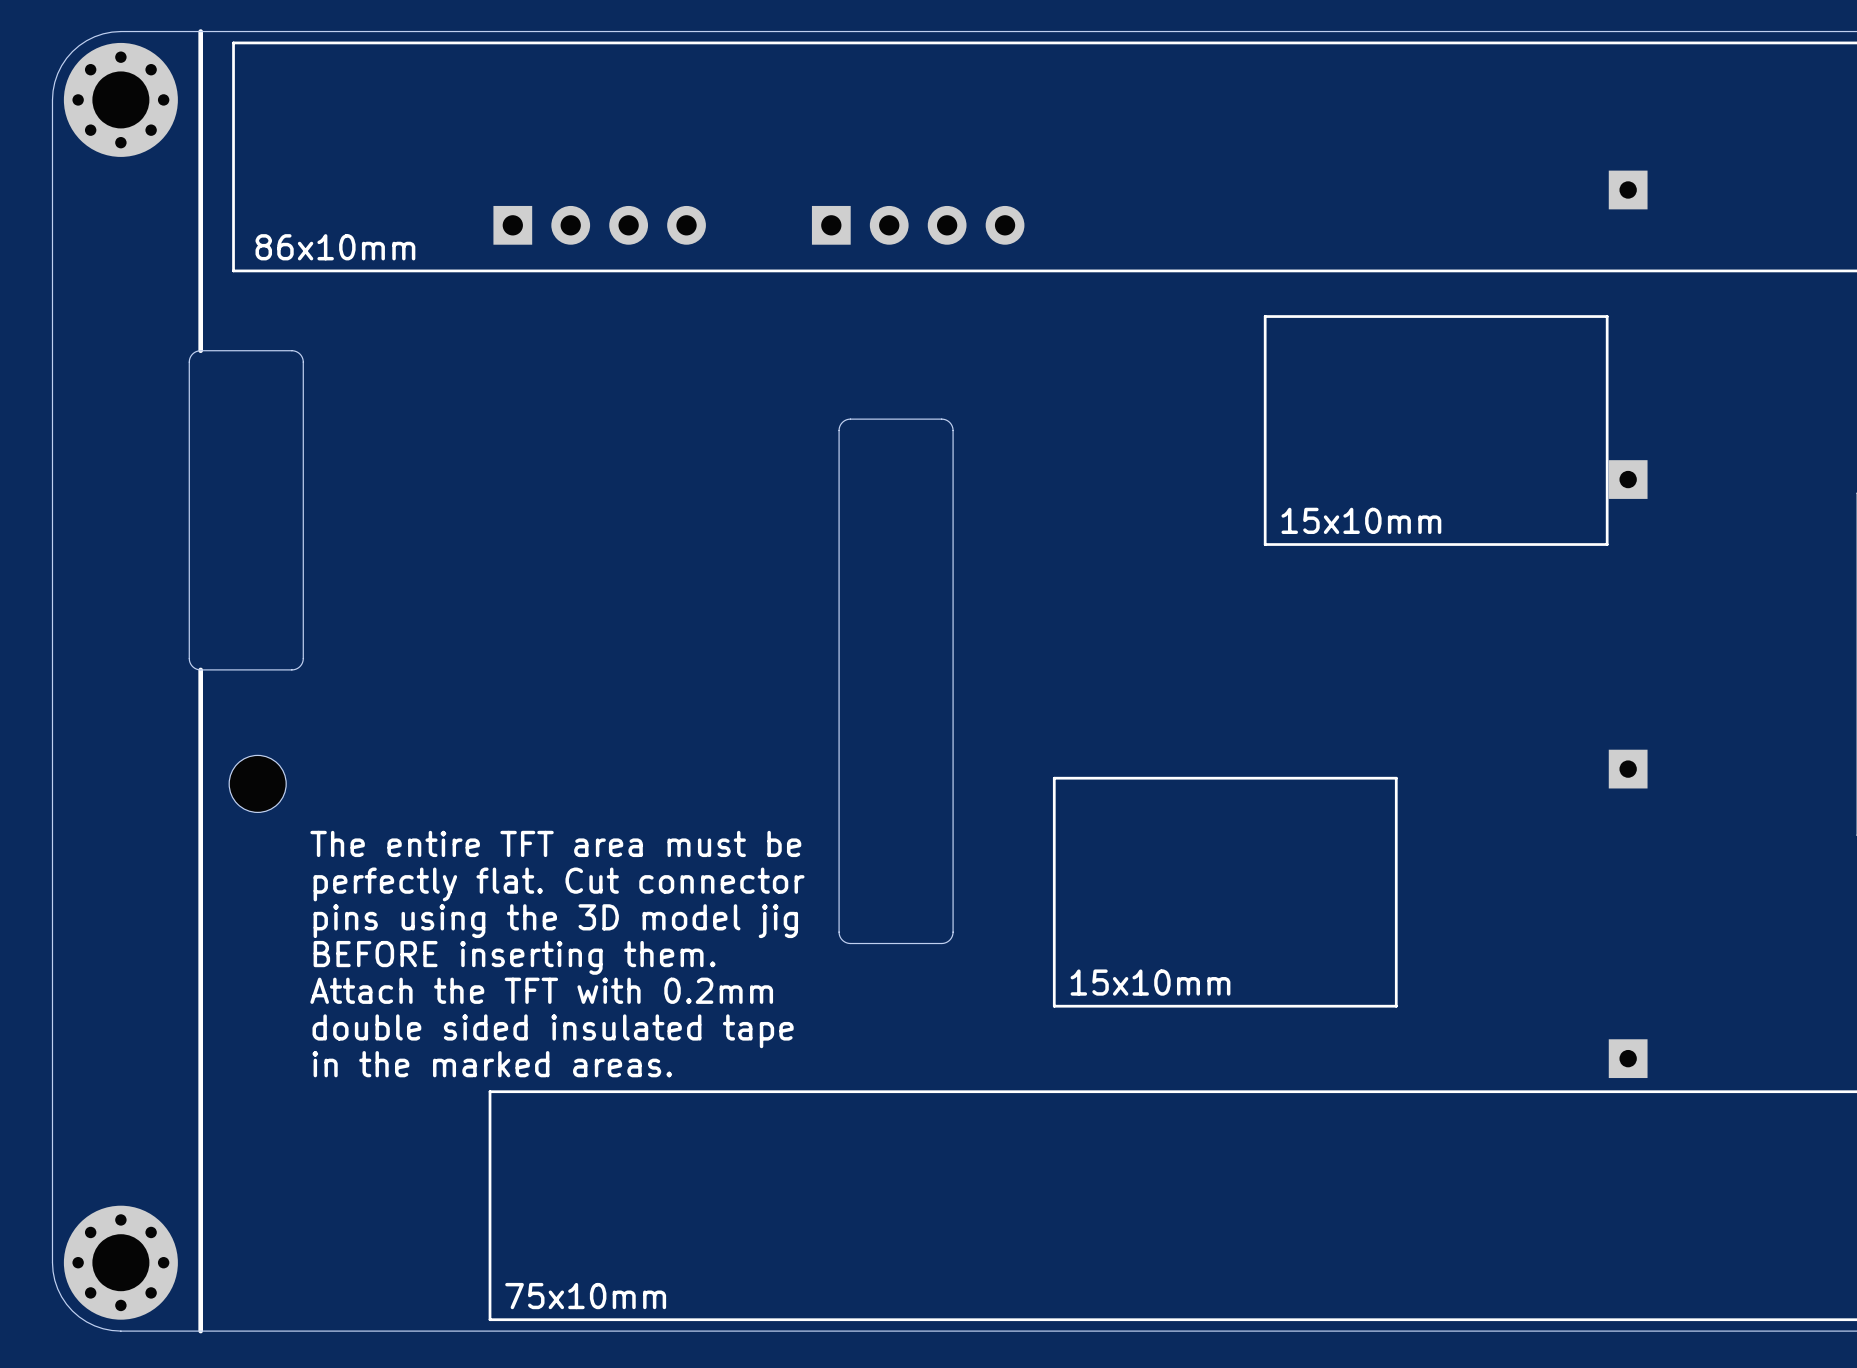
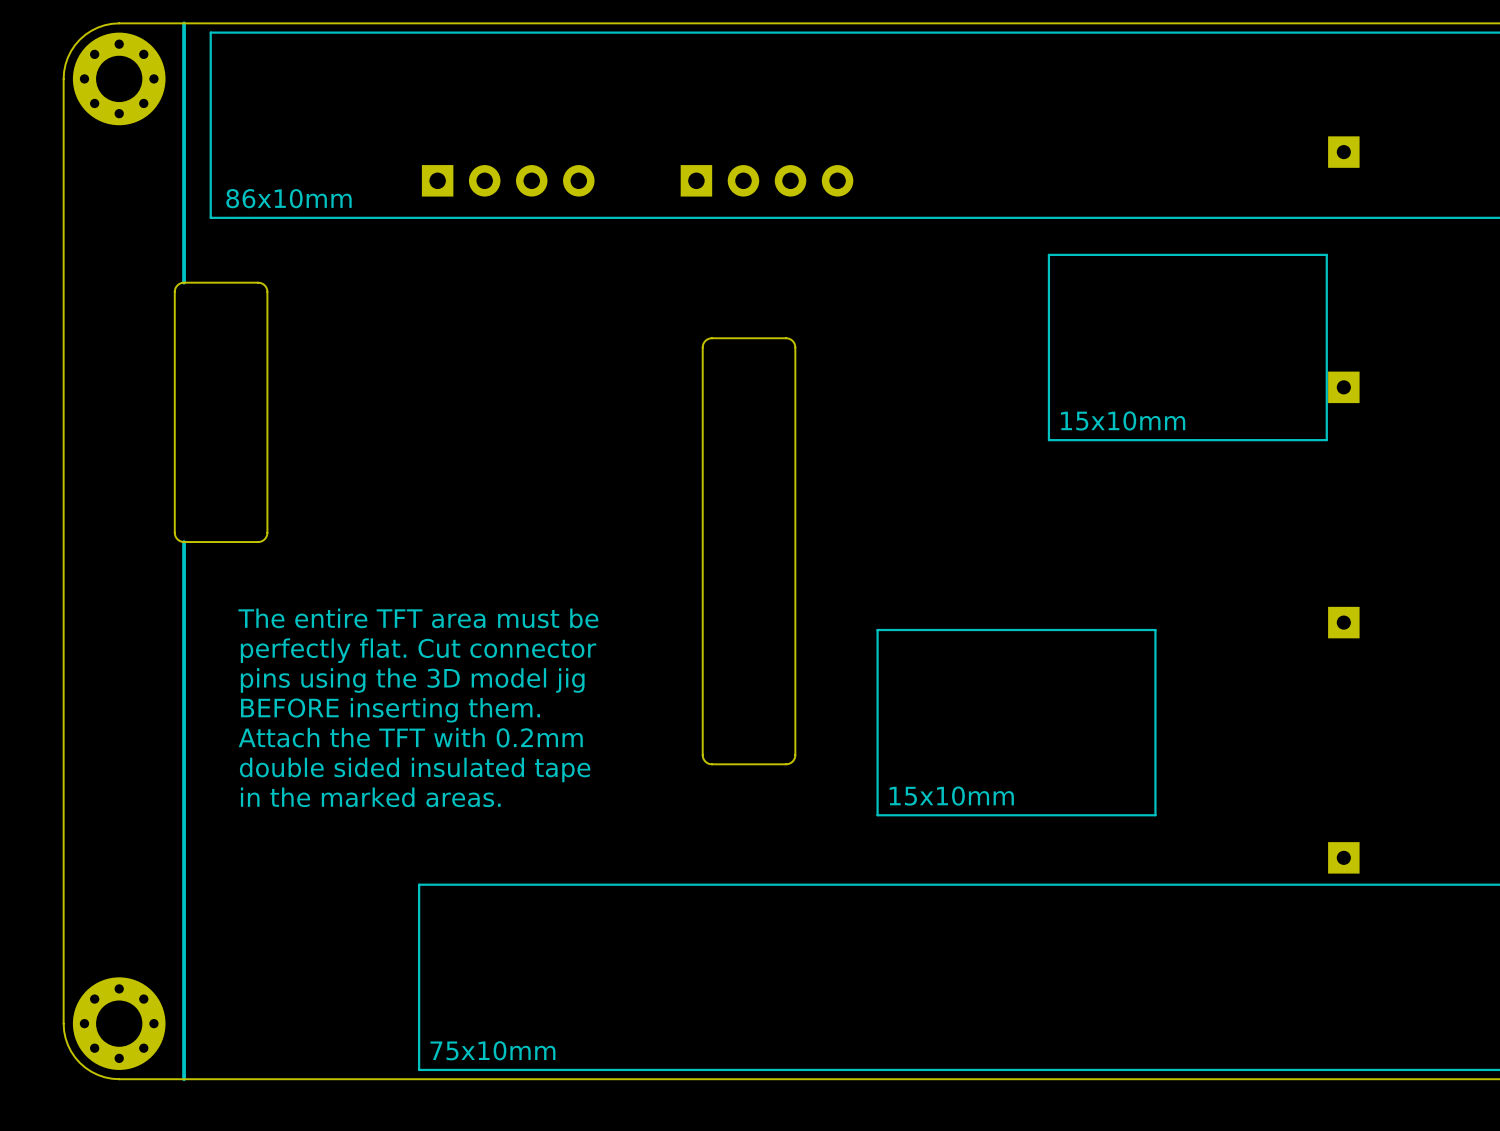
part: (257, 783) -> none
text position: The entire TFT area must be (555, 843) -> The entire TFT area must be (418, 618)
text position: perfectly flat. Cut connector (559, 884) -> perfectly flat. Cut connector (418, 650)
text position: pins using the 3D model jig (555, 921) -> pins using the 3D model jig (412, 680)
text position: BEFORE inserting them. (514, 957) -> BEFORE inserting them. (390, 710)
text position: Attach the TFT with 0.2mm (541, 990) -> Attach the TFT with 0.2mm (410, 737)
text position: double sided insulated tape (553, 1031) -> double sided insulated tape (415, 769)
text position: in the marked areas. (492, 1064) -> in the marked areas. (370, 797)

